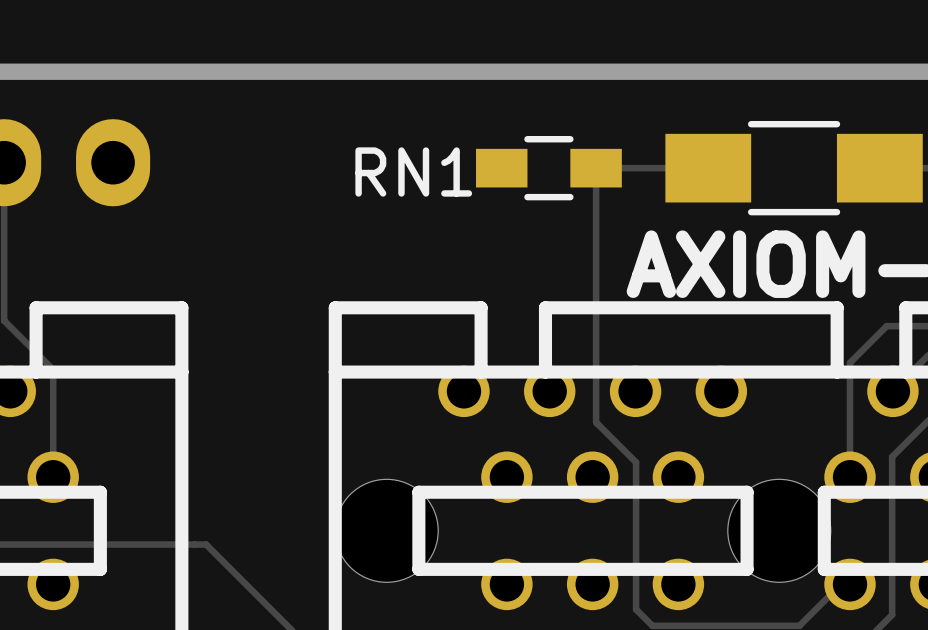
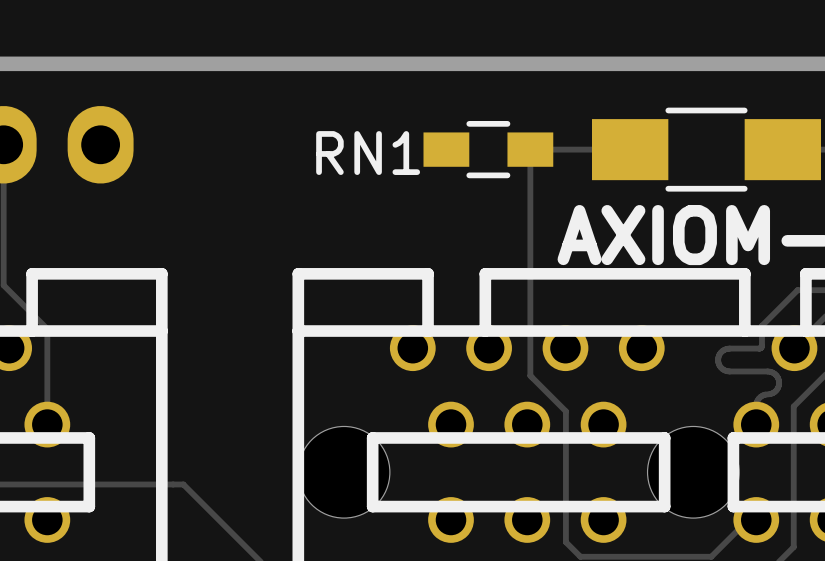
track: (896, 326) (886, 326) (850, 362) (850, 456) -> (797, 290) (761, 325) (761, 345)
track: none -> (759, 348) (727, 348) (720, 352) (718, 360) (720, 367) (727, 371) (767, 371) (776, 375) (779, 382) (776, 390) (760, 396) (756, 405)

